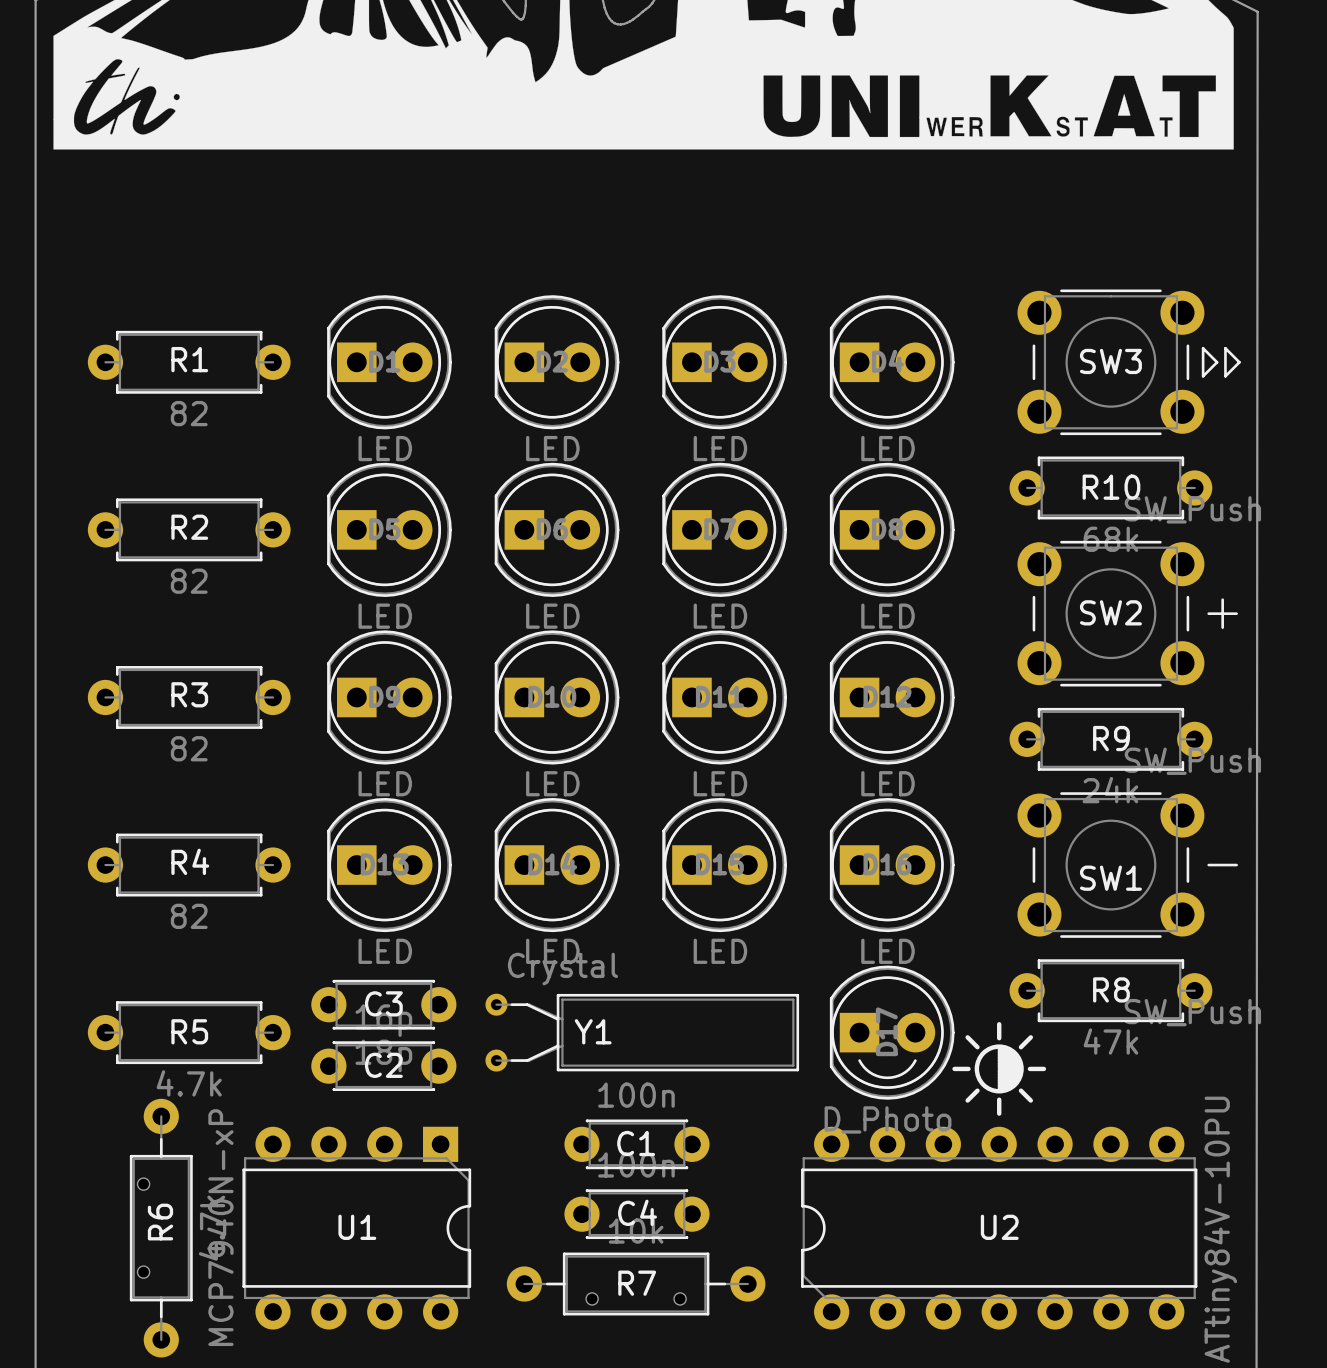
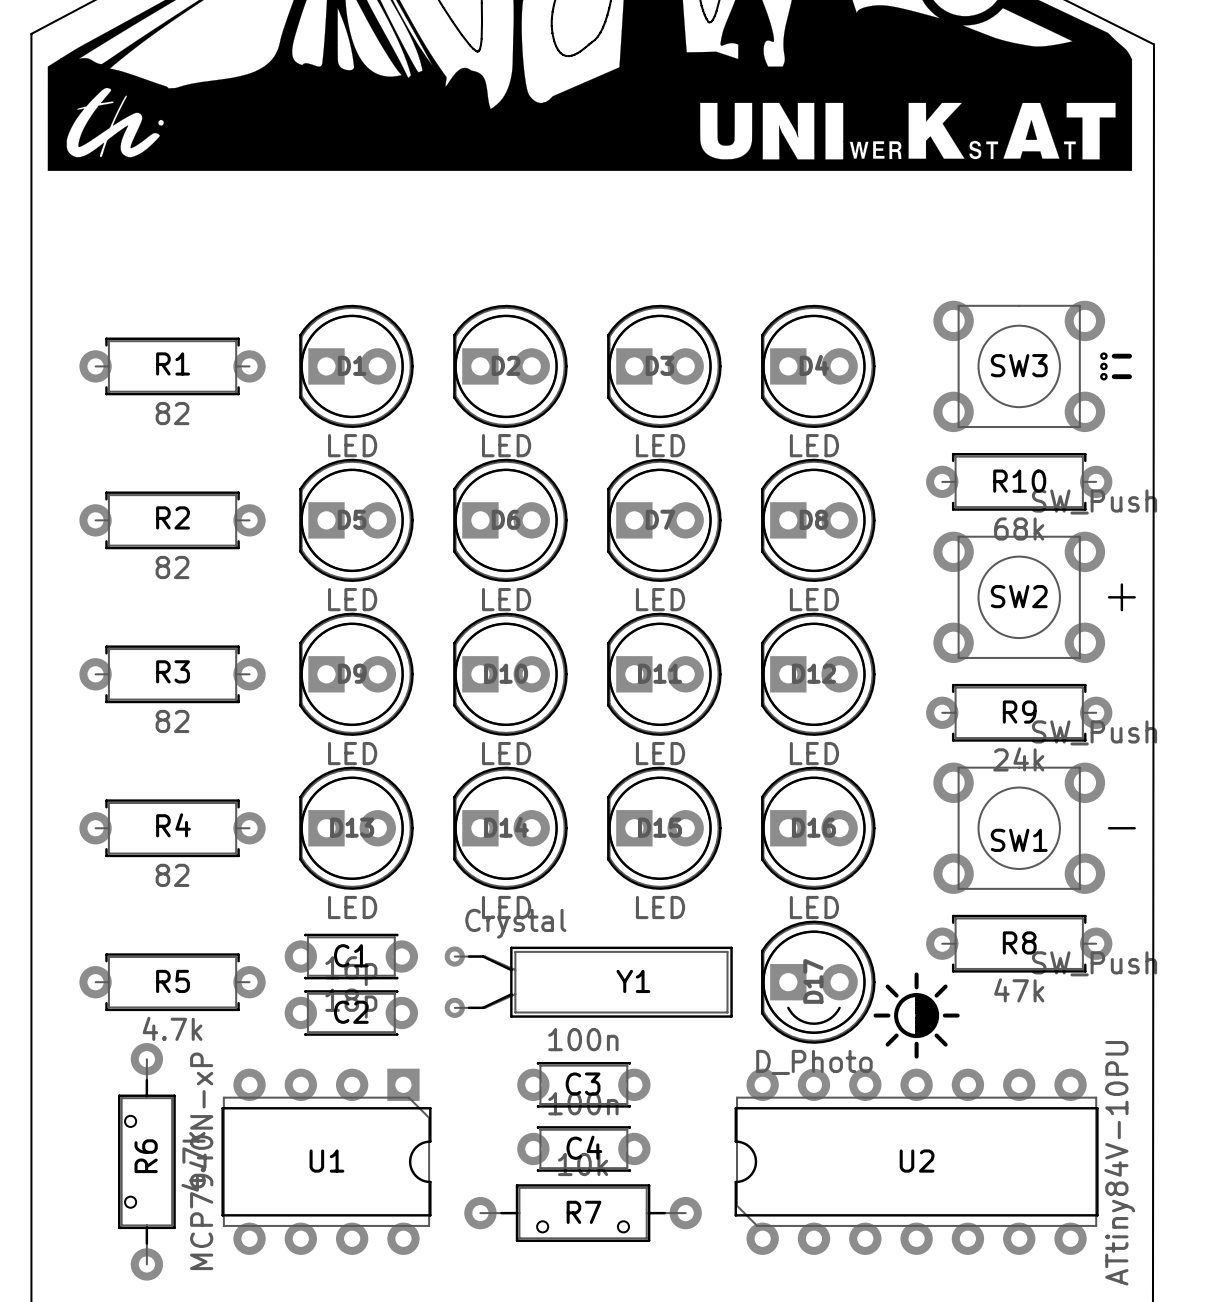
SW3 footprint: [1017, 289, 1205, 436] -> [933, 300, 1106, 433]
drawing: none -> [1100, 352, 1108, 381]
line: (1203, 348) (1203, 376) (1217, 362) (1203, 348) -> none
line: (1225, 348) (1239, 362) (1225, 376) (1225, 348) -> none
line: none -> (1114, 356) (1129, 356)
line: none -> (1114, 376) (1129, 376)
SW2 footprint: [1017, 540, 1205, 687] -> [933, 531, 1106, 663]
SW1 footprint: [1017, 792, 1205, 938] -> [933, 762, 1106, 894]
C3 name: C3 (383, 1003) -> C1 (351, 955)
Y1 name position: Y1 (593, 1031) -> Y1 (633, 981)
C1 name: C1 (636, 1143) -> C3 (583, 1084)

